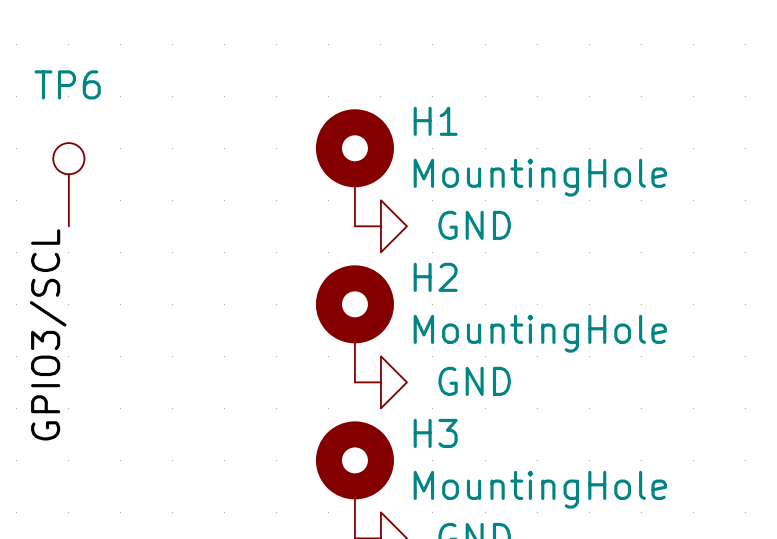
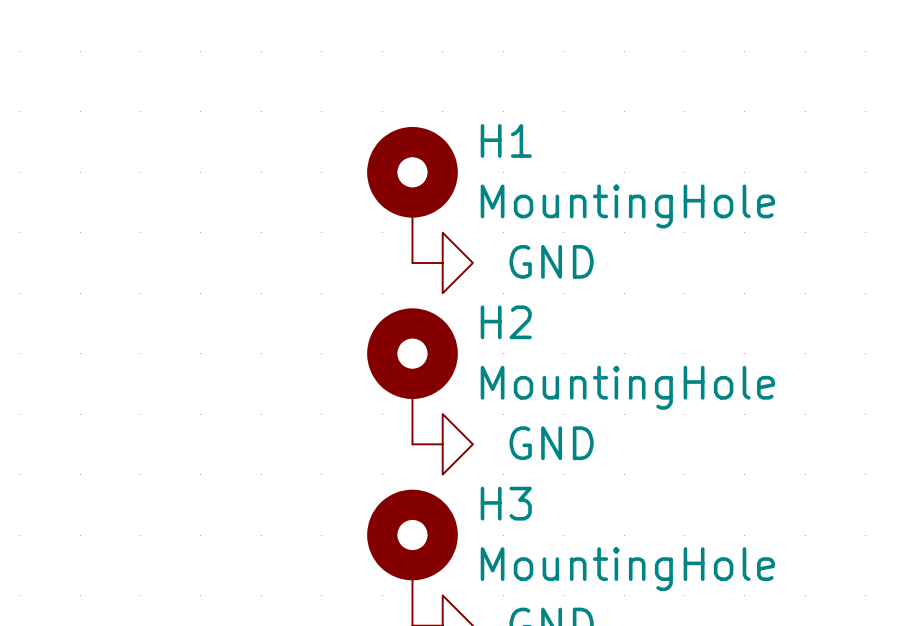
TP6: (68, 184) -> none
label: GPIO3/SCL (48, 334) -> none

